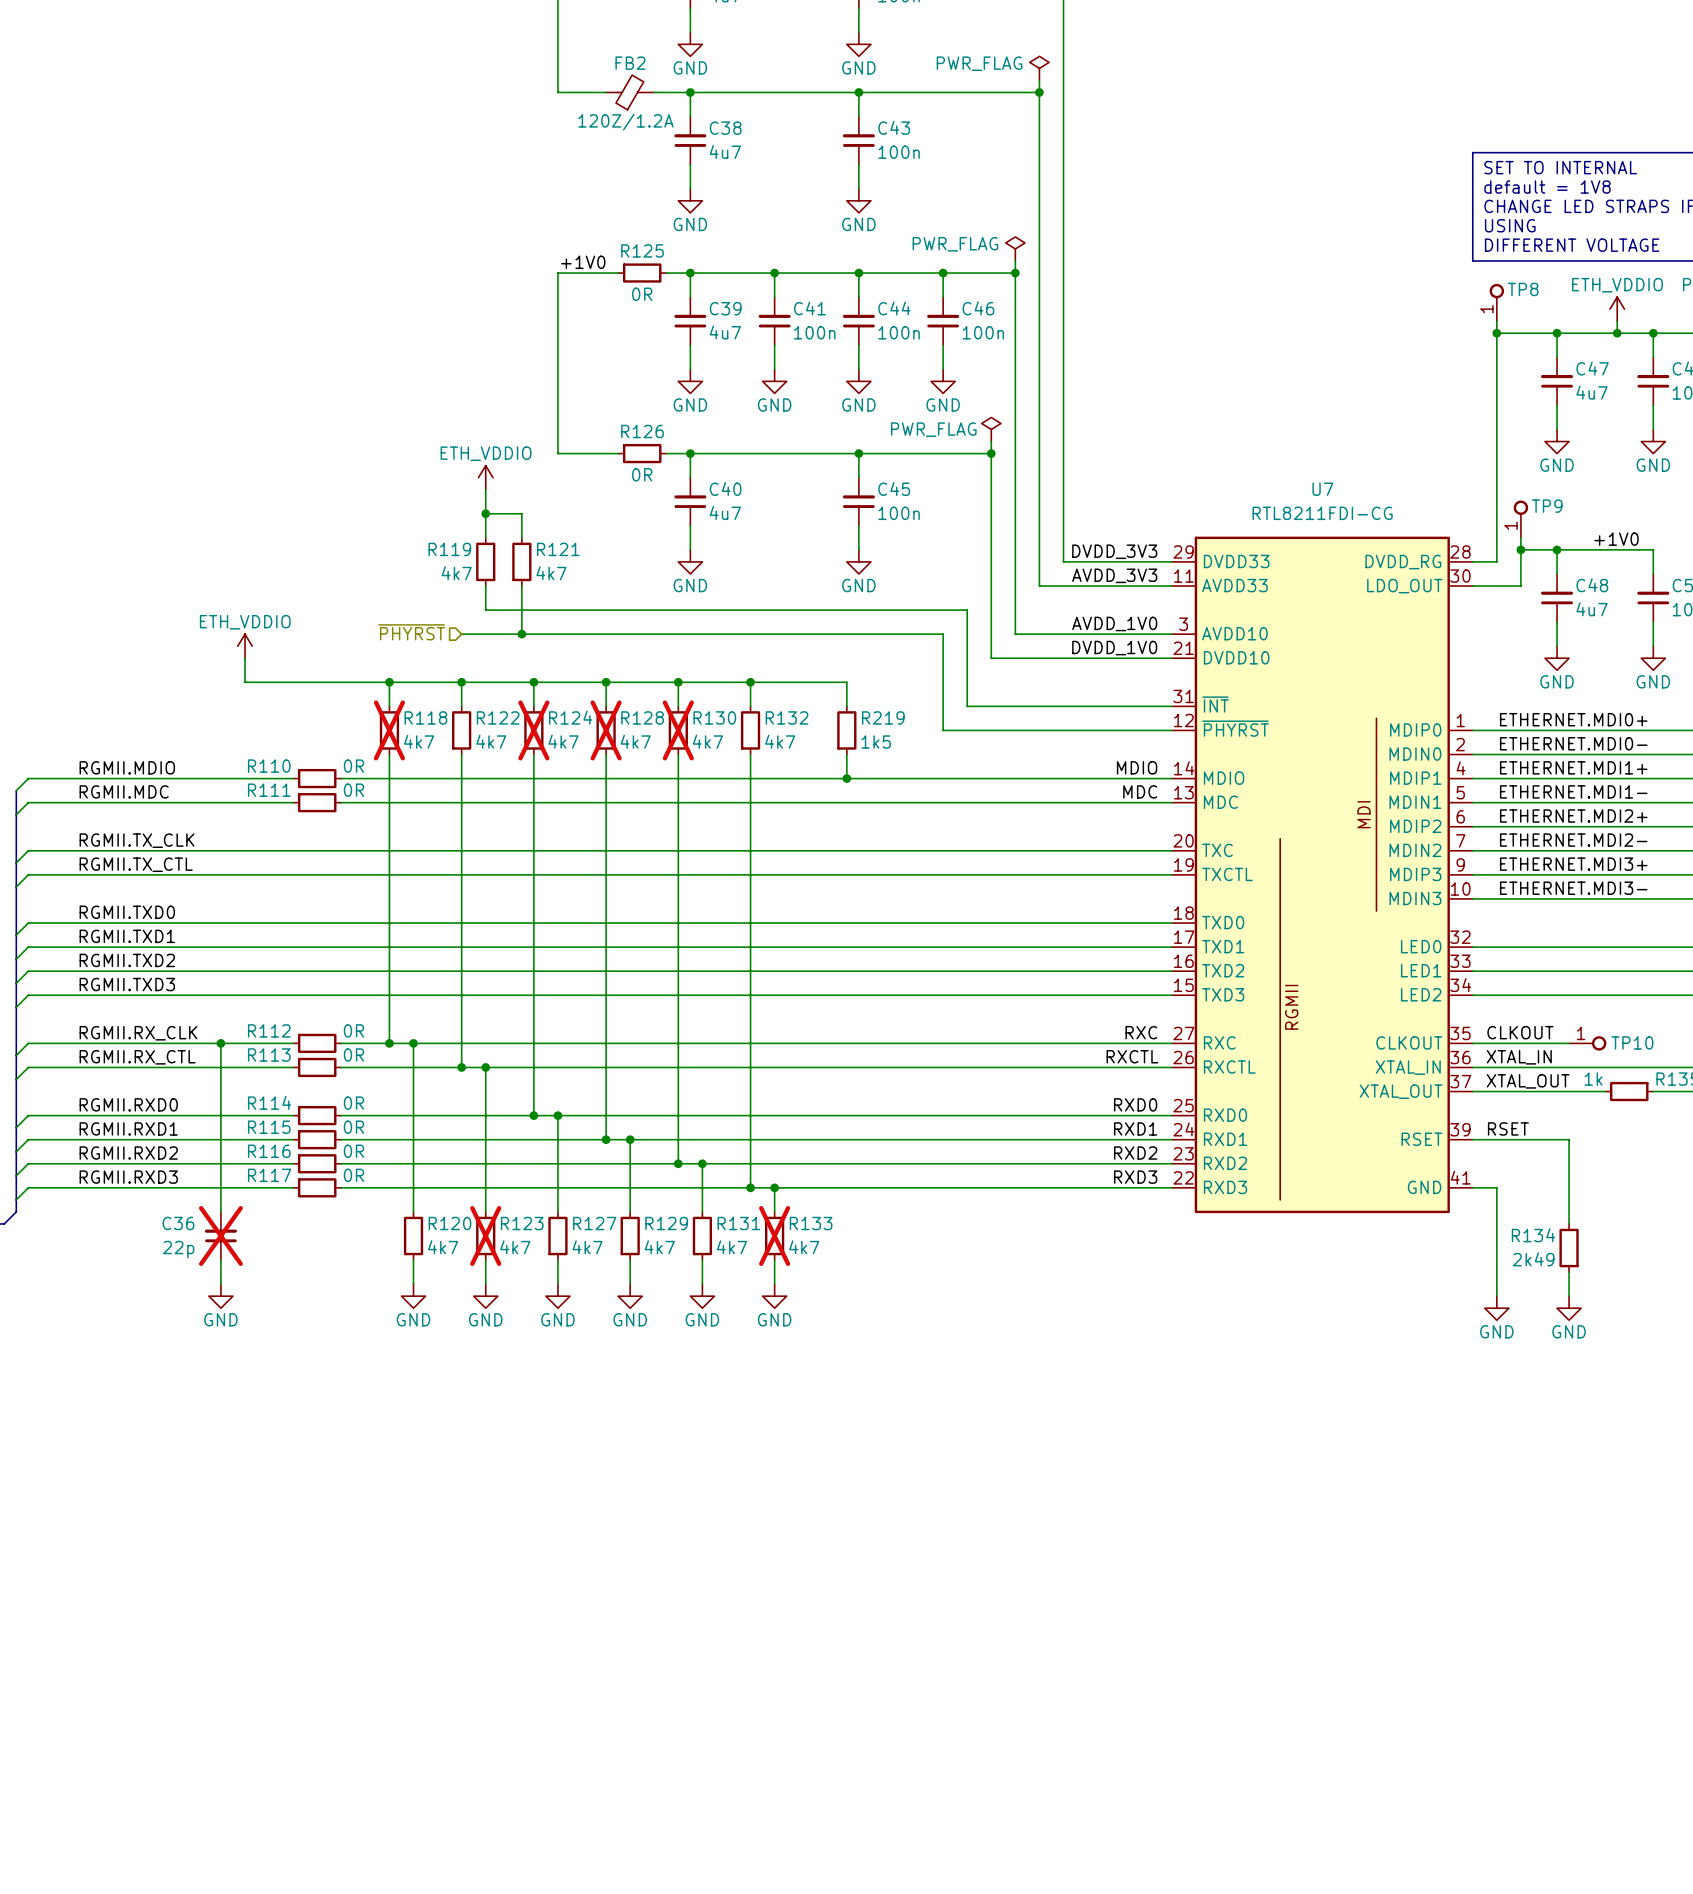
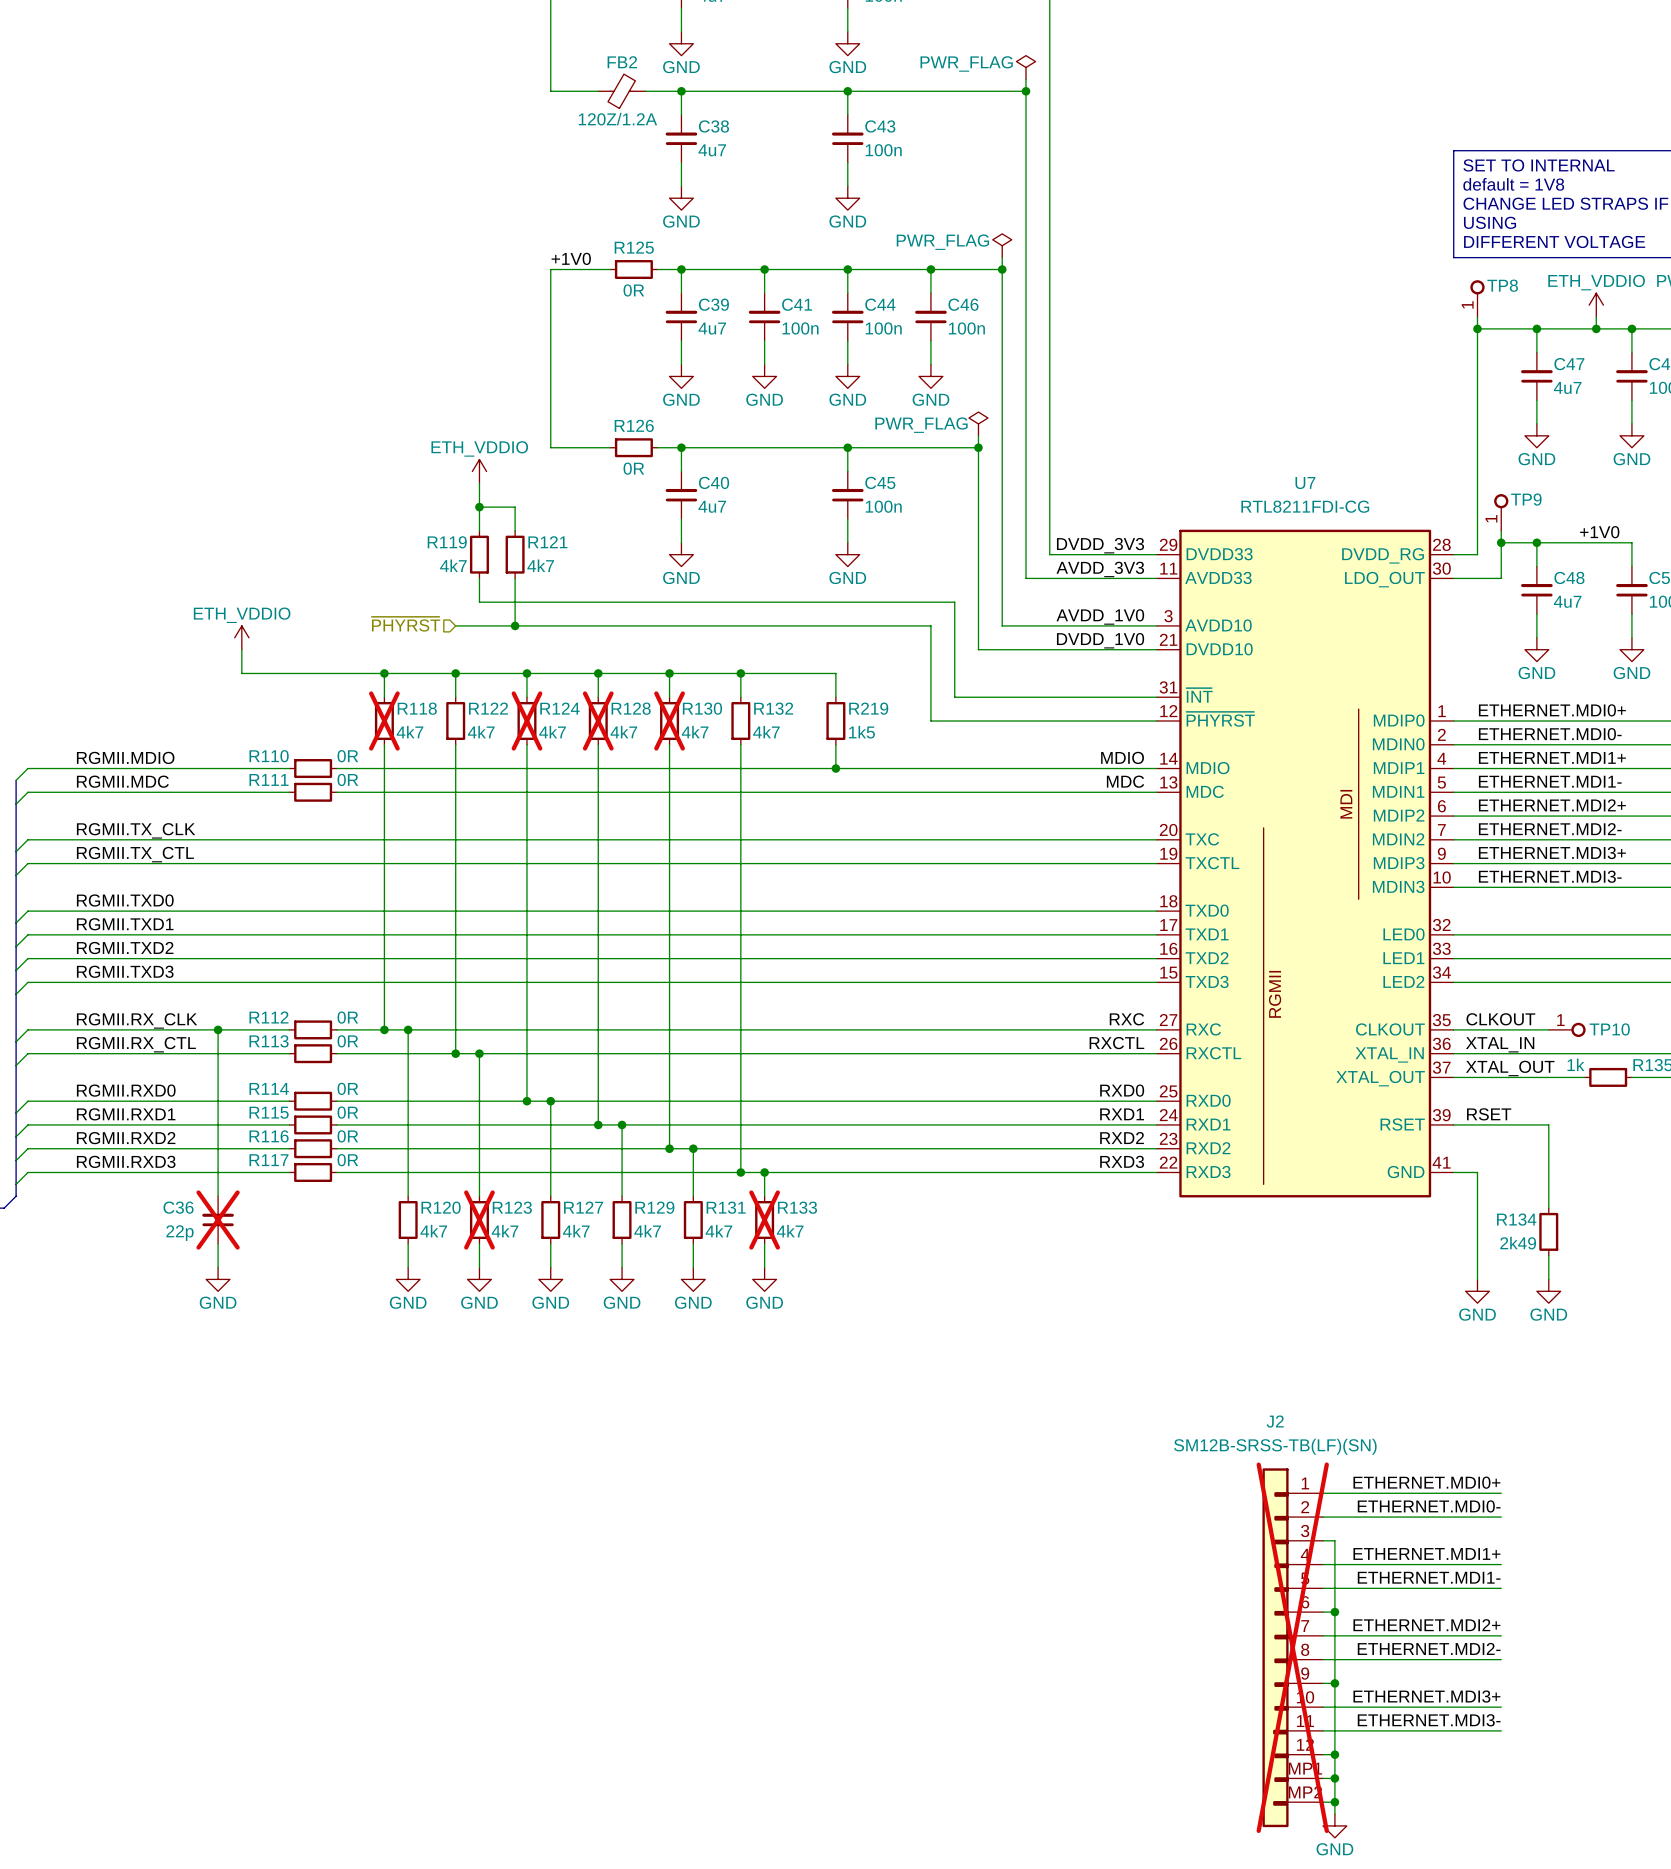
label: none -> ETHERNET.MDI0+ (1426, 1482)
wire: none -> (1323, 1493) (1501, 1493)
label: none -> ETHERNET.MDI0- (1429, 1506)
wire: none -> (1323, 1517) (1501, 1517)
wire: none -> (1323, 1540) (1334, 1540) (1334, 1814)
label: none -> ETHERNET.MDI1+ (1426, 1553)
wire: none -> (1323, 1564) (1501, 1564)
label: none -> ETHERNET.MDI1- (1429, 1577)
wire: none -> (1323, 1588) (1501, 1588)
wire: none -> (1323, 1612) (1334, 1612)
junction: none -> (1334, 1612)
label: none -> ETHERNET.MDI2+ (1426, 1625)
wire: none -> (1323, 1635) (1501, 1635)
J2: none -> (1292, 1647)
label: none -> ETHERNET.MDI2- (1429, 1648)
wire: none -> (1323, 1659) (1501, 1659)
wire: none -> (1323, 1683) (1334, 1683)
junction: none -> (1334, 1683)
label: none -> ETHERNET.MDI3+ (1426, 1696)
wire: none -> (1323, 1707) (1501, 1707)
label: none -> ETHERNET.MDI3- (1429, 1720)
wire: none -> (1323, 1730) (1501, 1730)
wire: none -> (1323, 1754) (1334, 1754)
junction: none -> (1334, 1754)
wire: none -> (1323, 1778) (1334, 1778)
junction: none -> (1334, 1778)
wire: none -> (1323, 1802) (1334, 1802)
junction: none -> (1334, 1802)
power symbol: none -> GND (1334, 1825)

